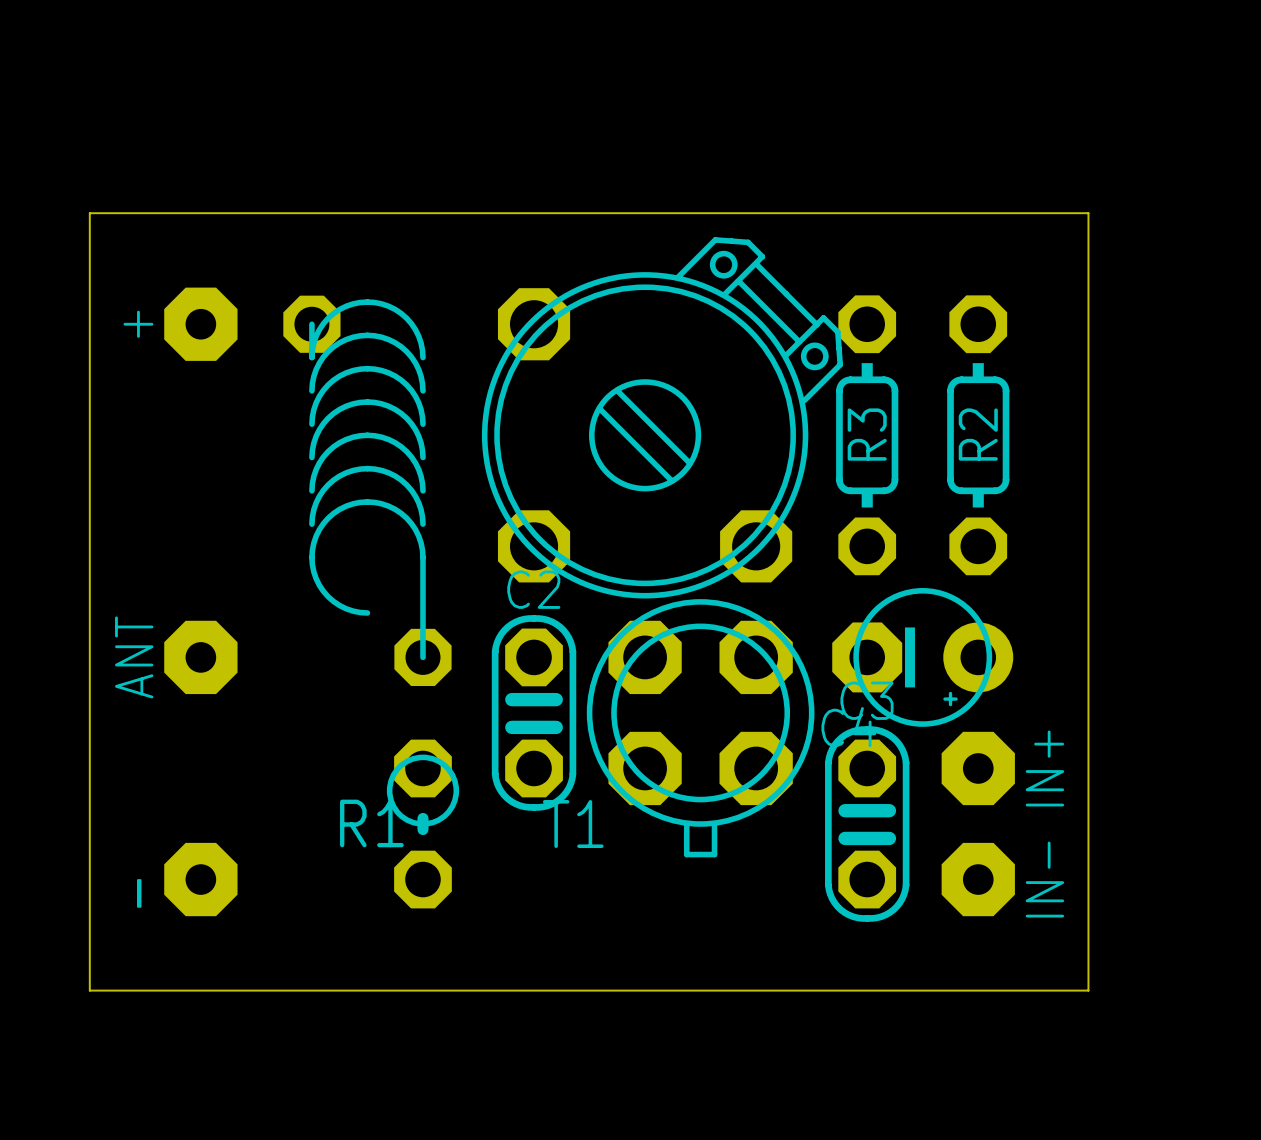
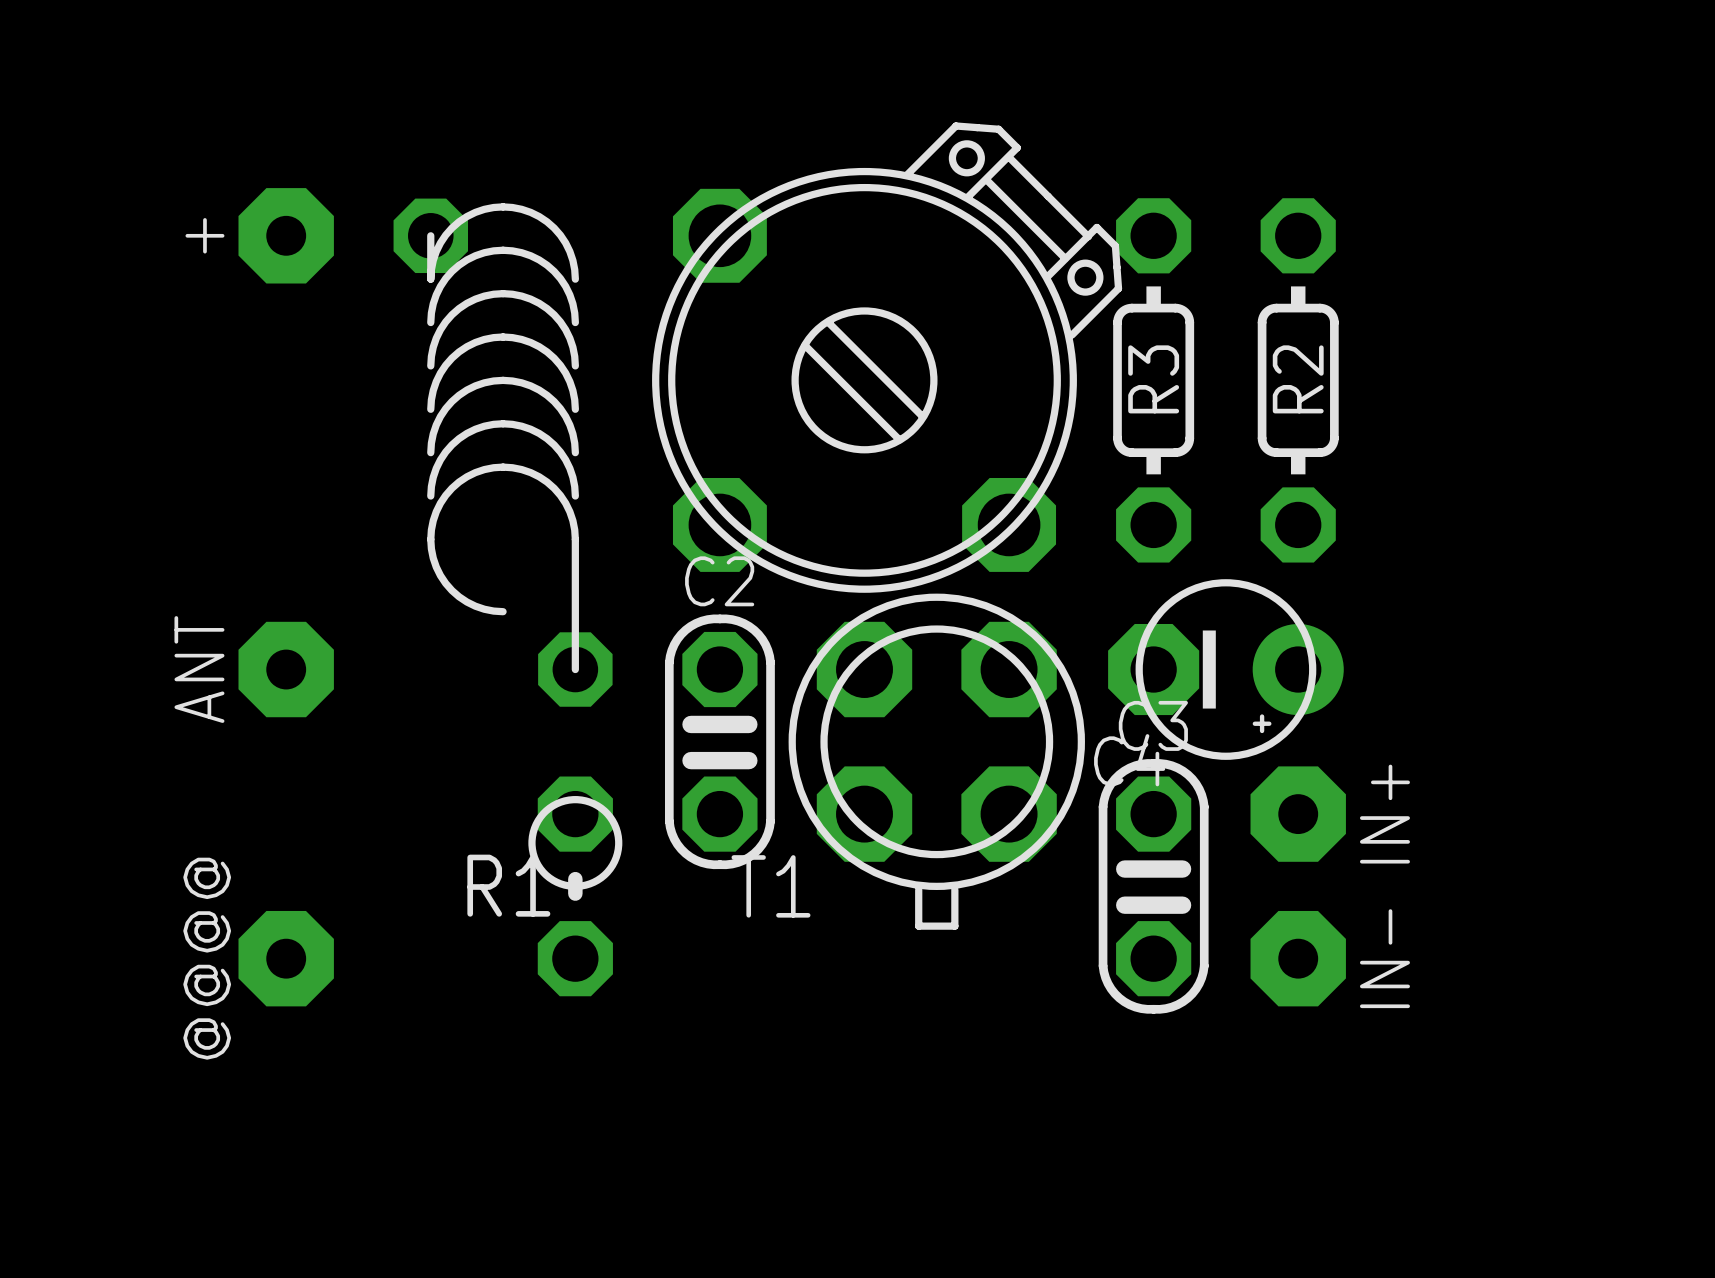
board edge: (89, 213) (1088, 213) (1088, 990) (89, 990) (89, 213) -> none
part name: ̶̶ (139, 893) -> @@@@ (207, 958)

